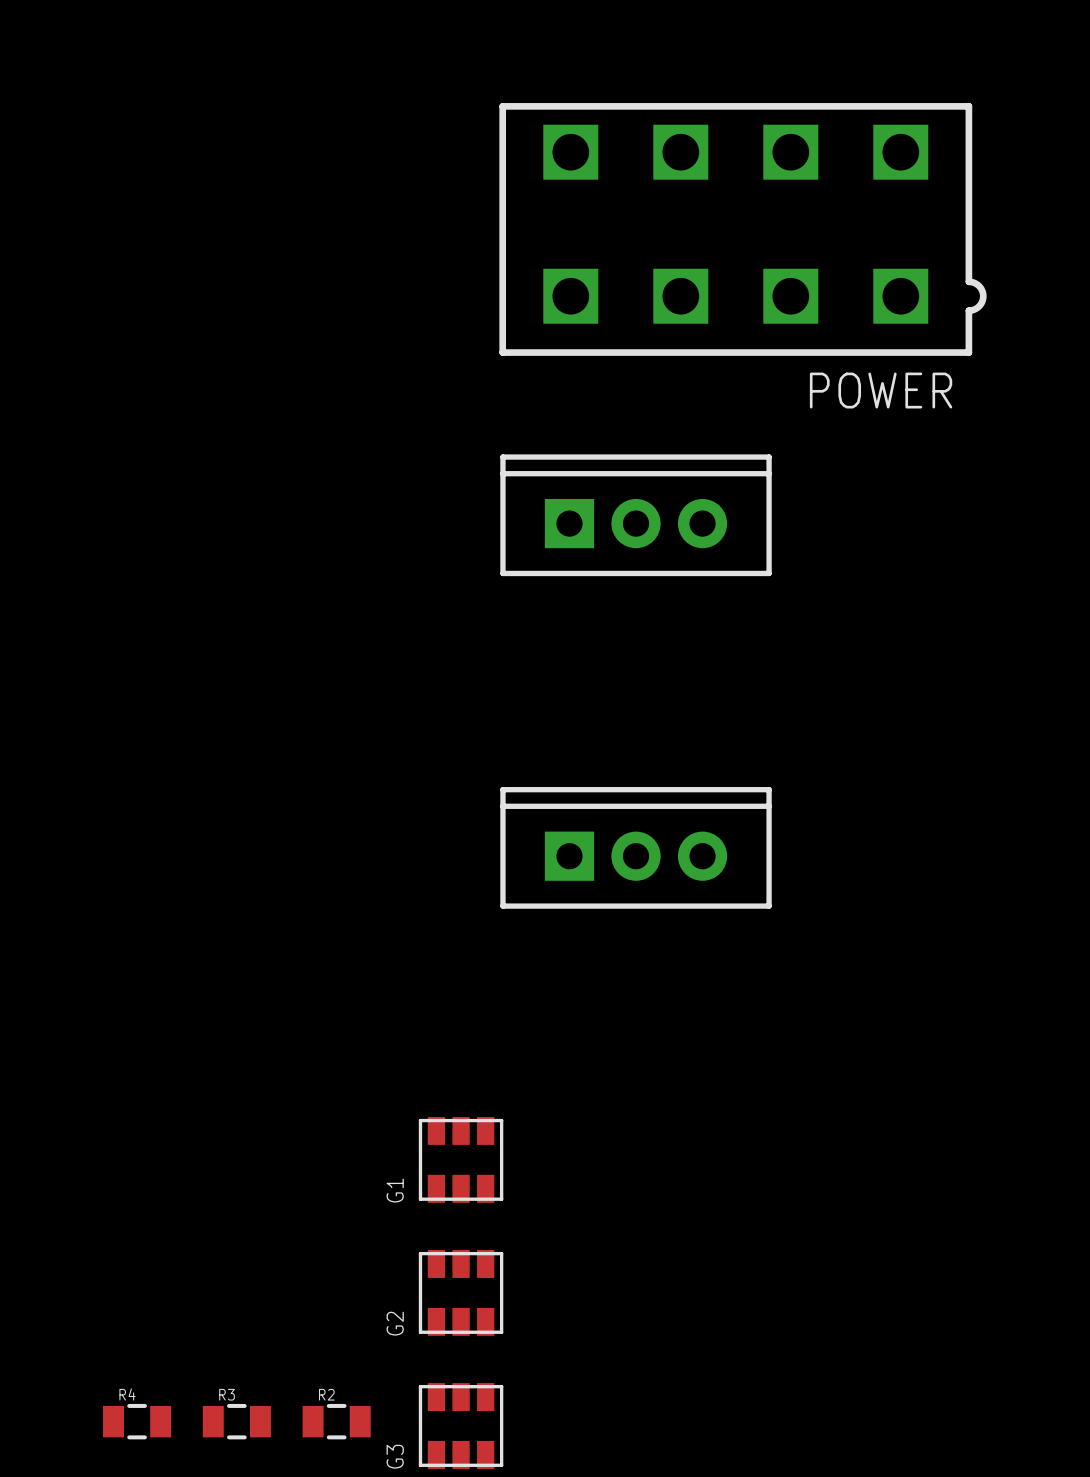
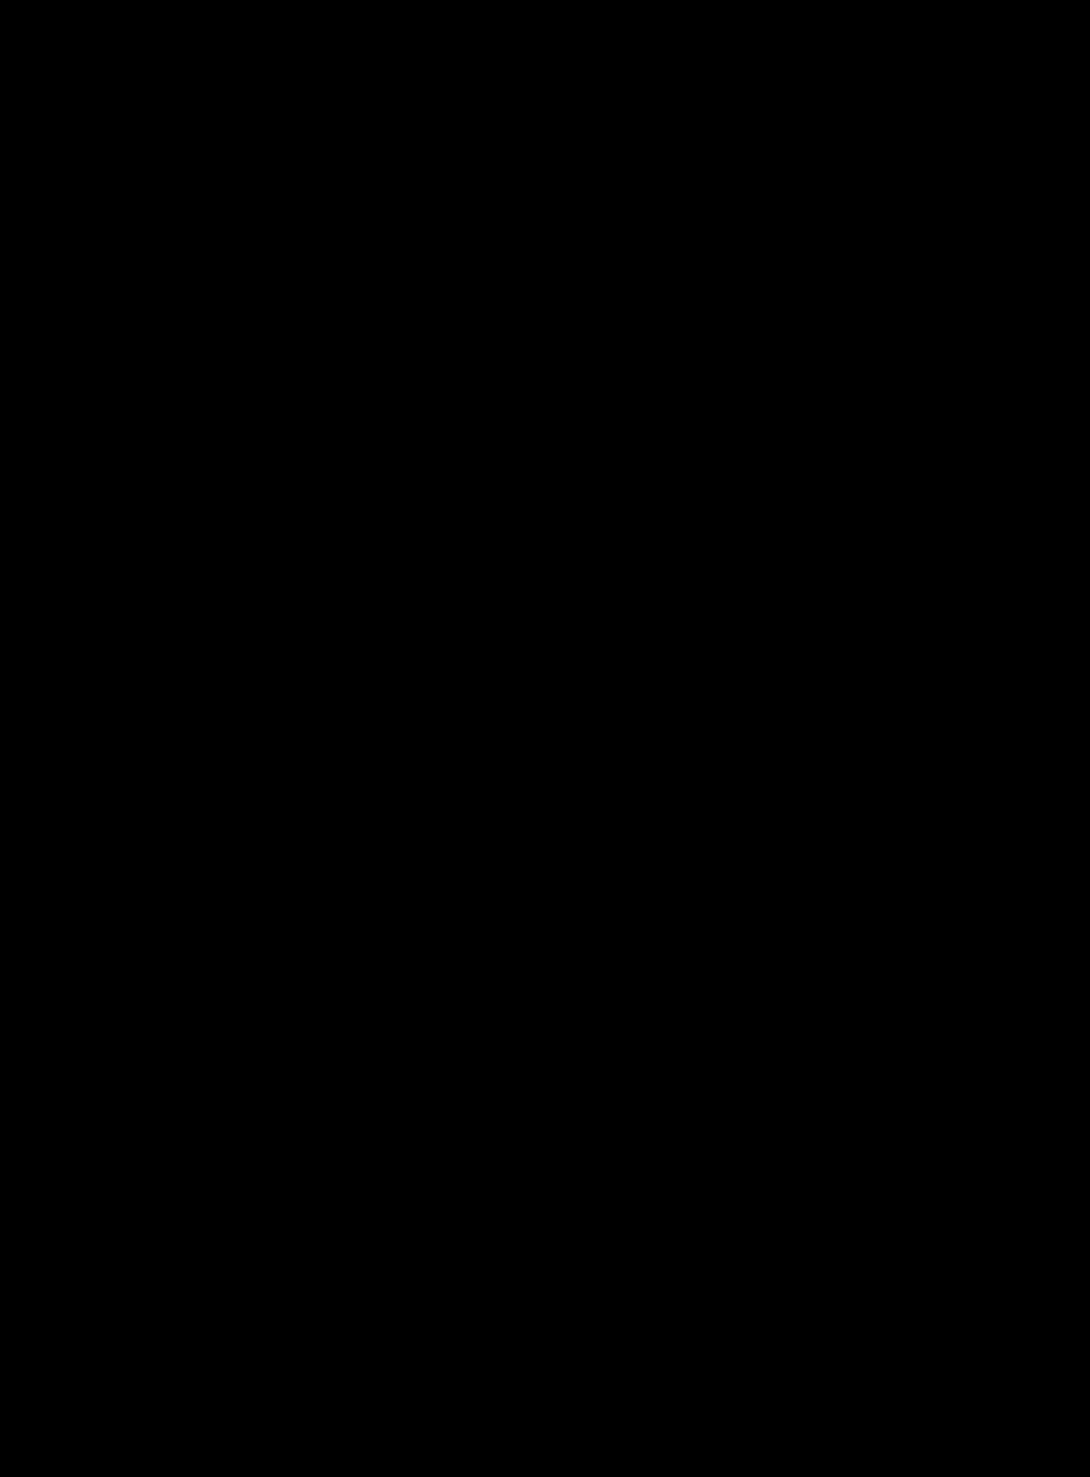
POWER: (743, 229) -> none
part: (636, 515) -> none
part: (636, 847) -> none
G1: (461, 1159) -> none
G2: (461, 1292) -> none
R4: (137, 1421) -> none
R3: (236, 1421) -> none
R2: (336, 1421) -> none
G3: (461, 1425) -> none

